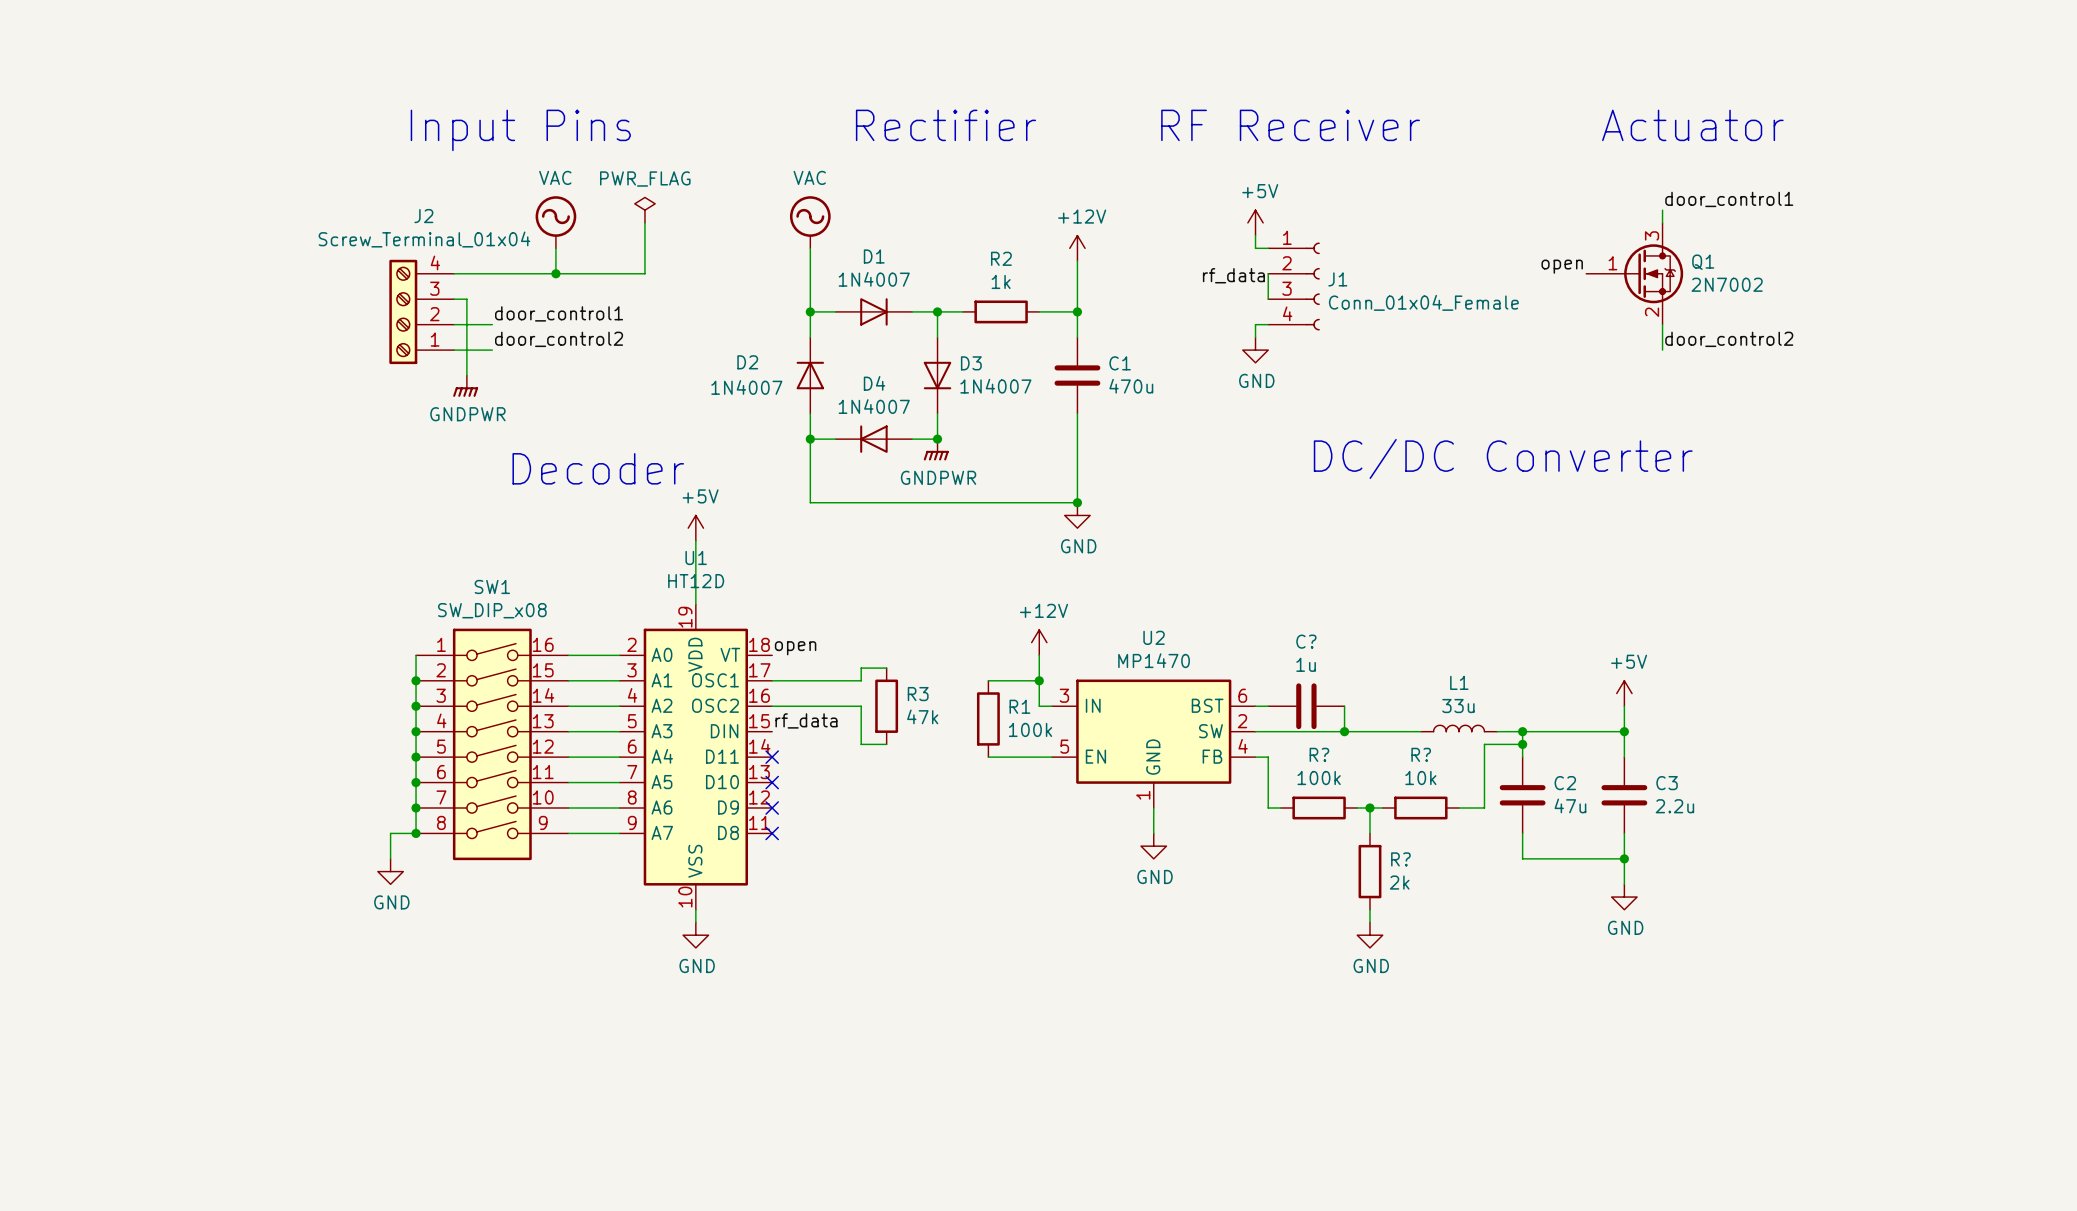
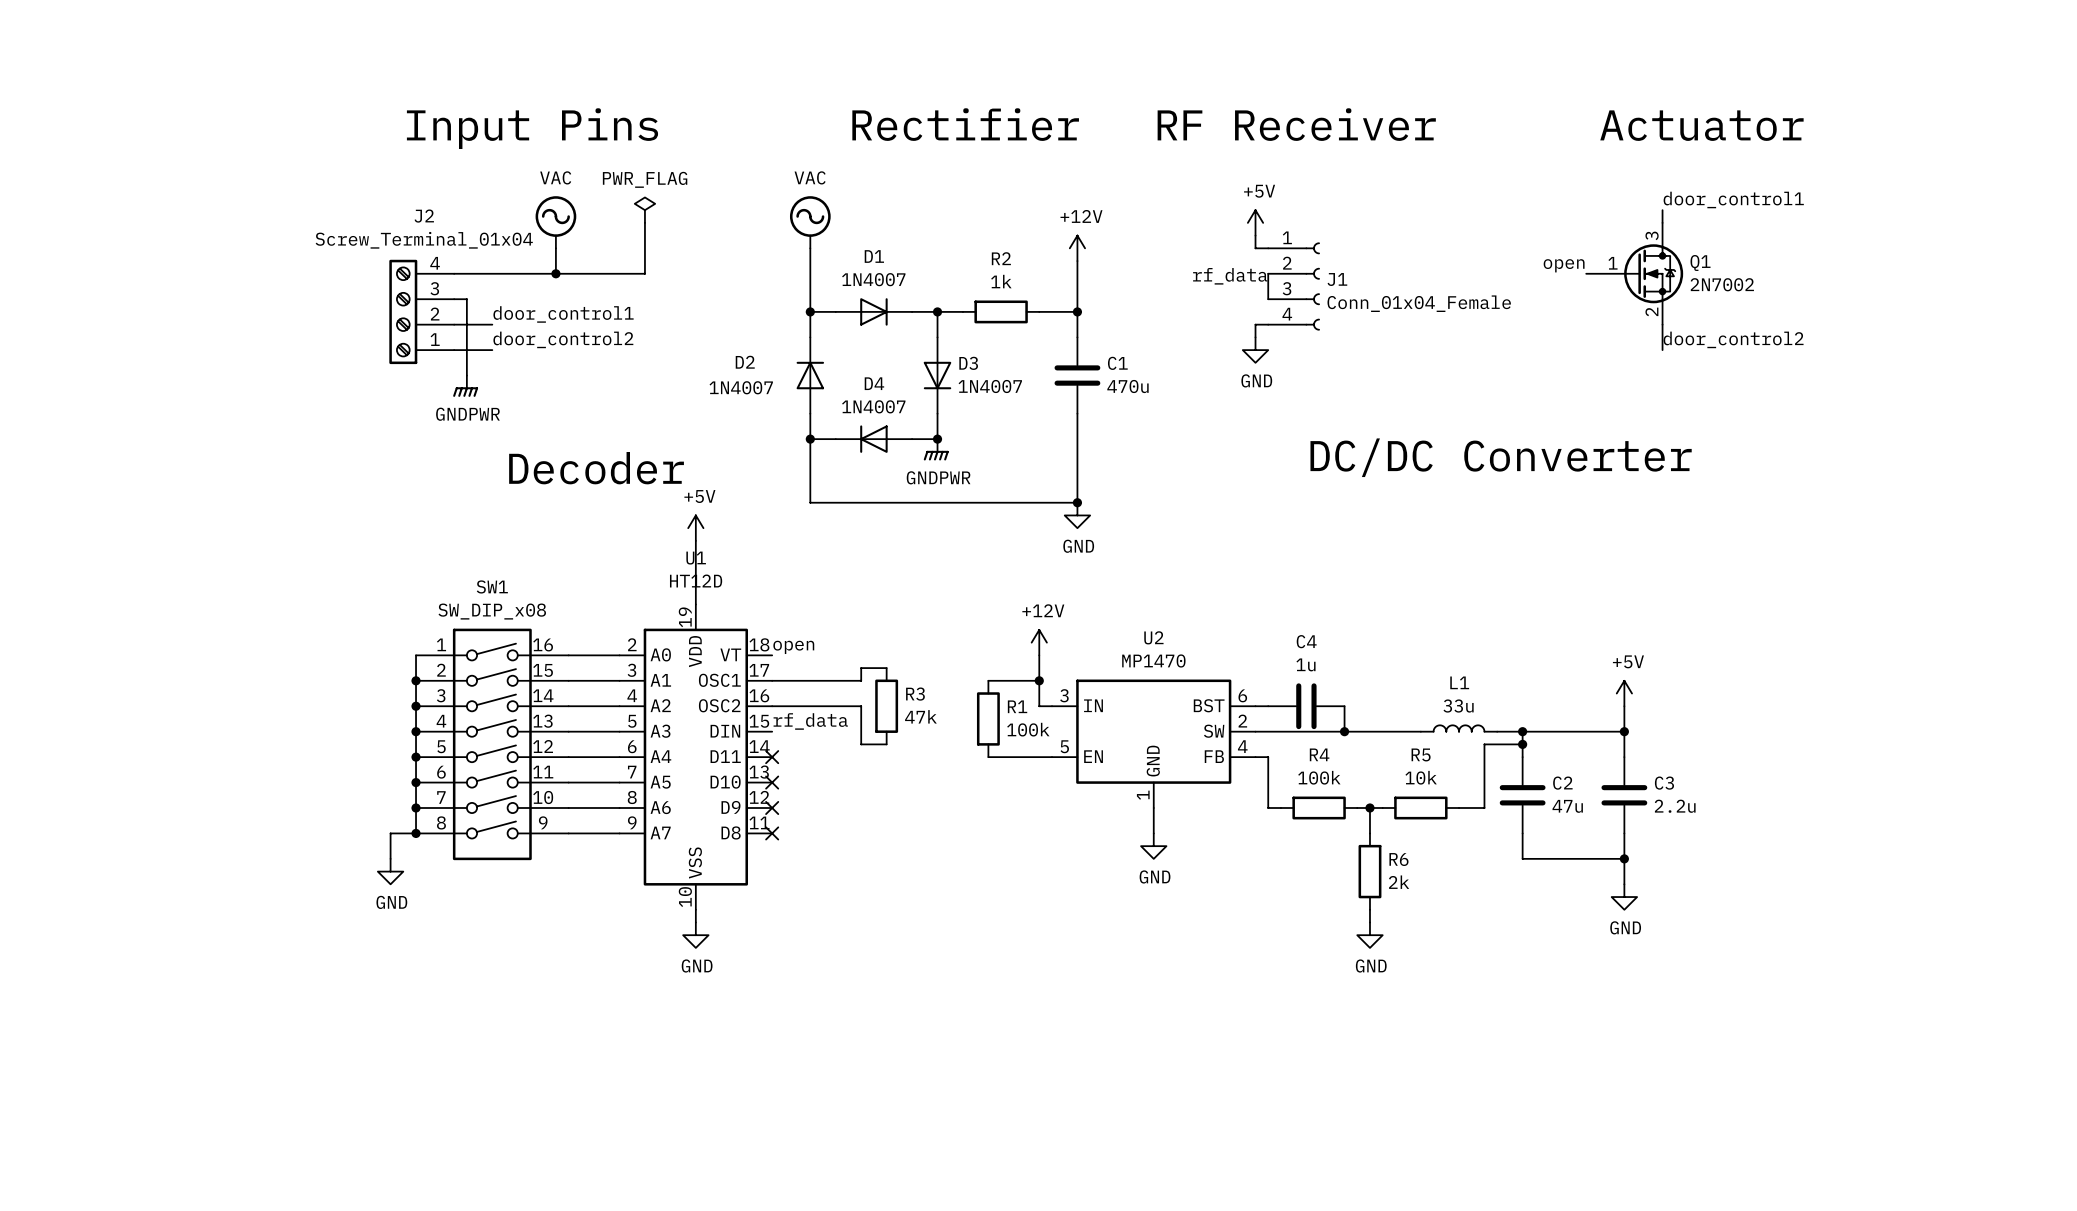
C? name: C? (1306, 641) -> C4 (1306, 641)
R? name: R? (1319, 754) -> R4 (1319, 754)
R? name: R? (1421, 754) -> R5 (1421, 754)
R? name: R? (1400, 859) -> R6 (1398, 859)

